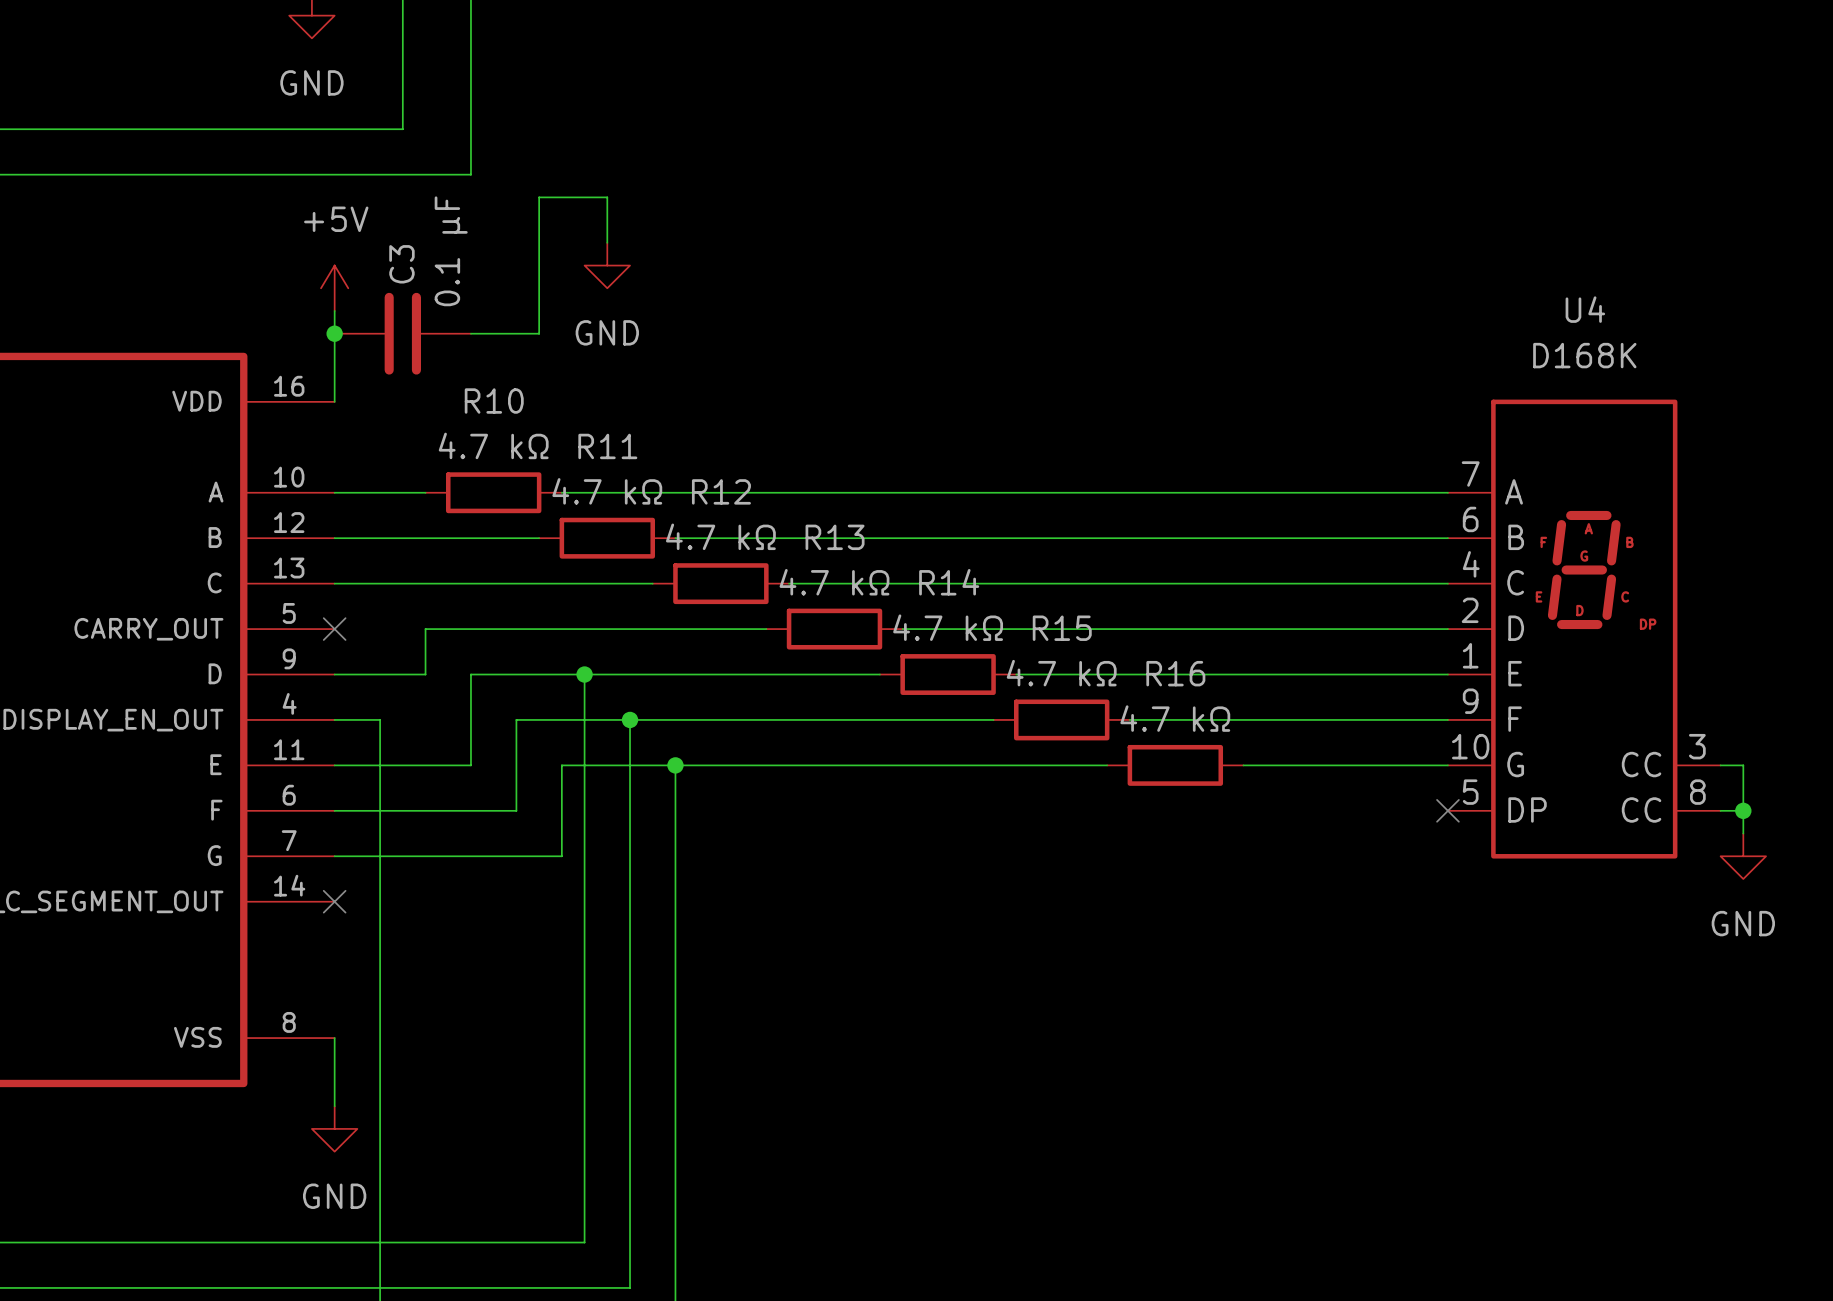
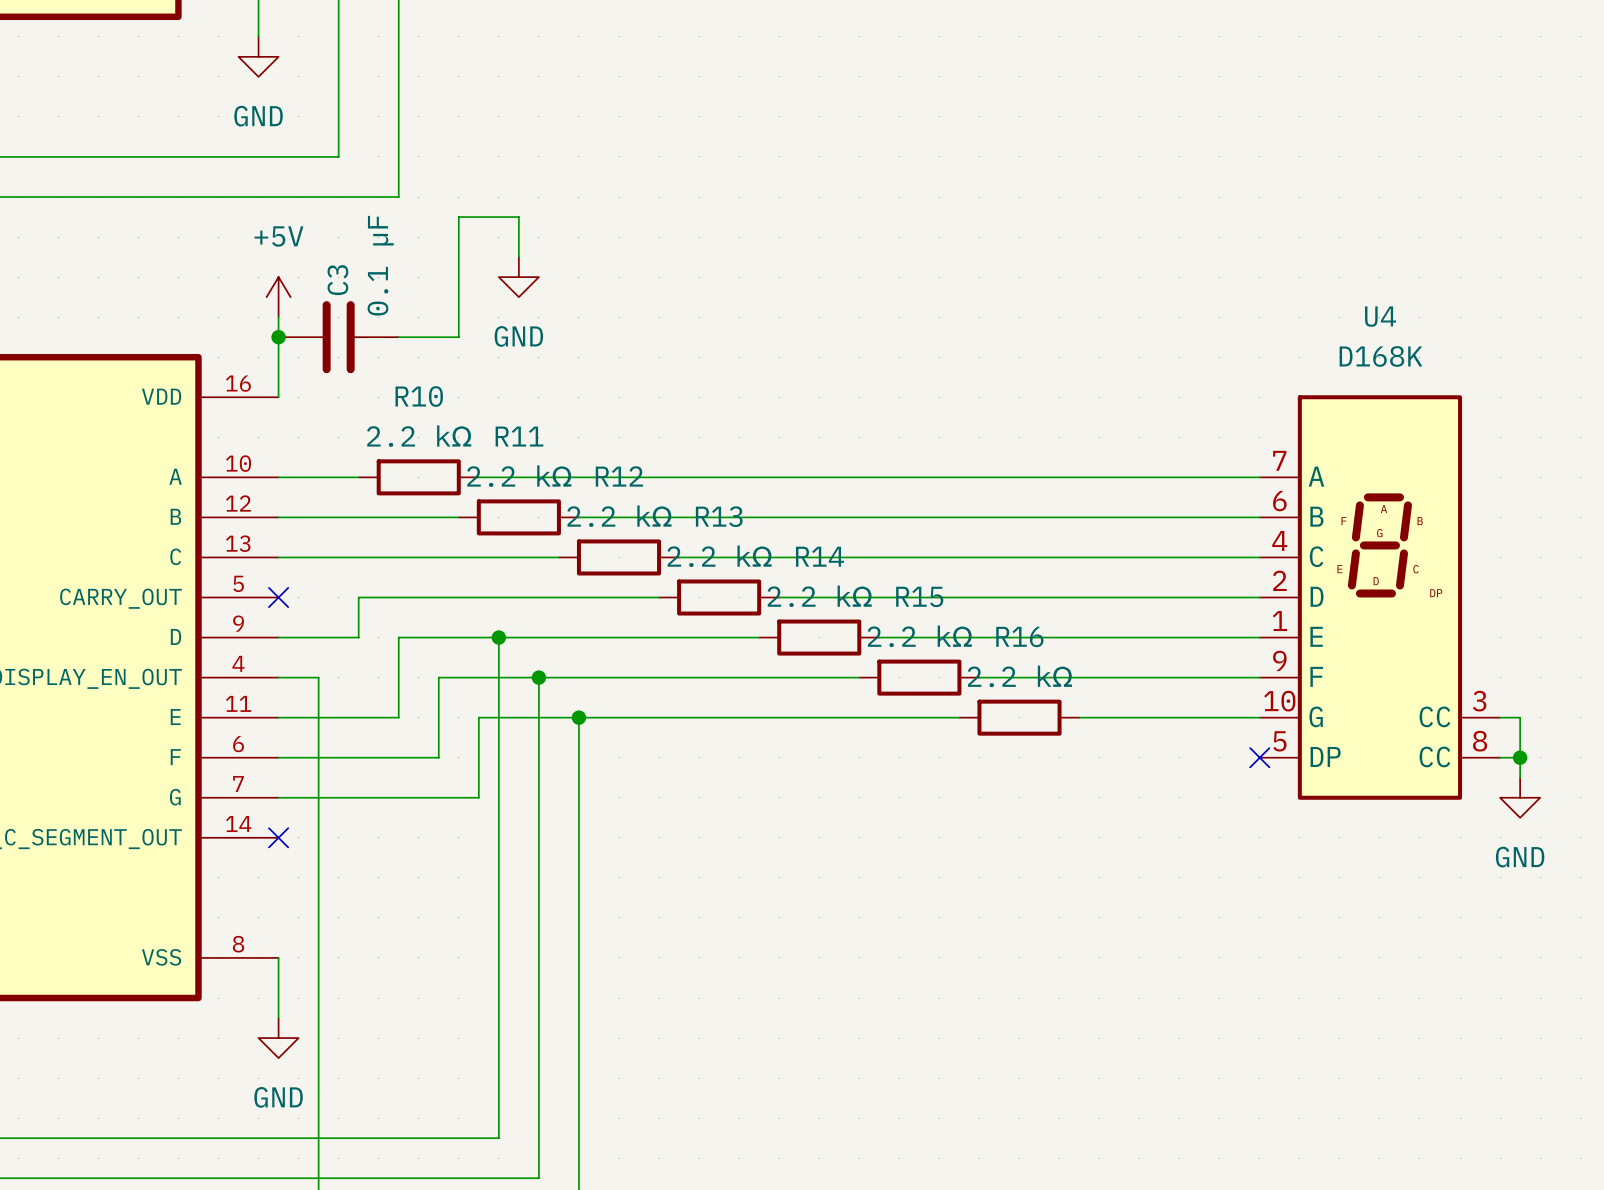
R10 value: 4.7 kΩ (493, 445) -> 2.2 kΩ (419, 436)
R11 value: 4.7 kΩ (607, 491) -> 2.2 kΩ (519, 476)
R12 value: 4.7 kΩ (720, 536) -> 2.2 kΩ (619, 516)
R13 value: 4.7 kΩ (834, 582) -> 2.2 kΩ (719, 556)
R14 value: 4.7 kΩ (948, 627) -> 2.2 kΩ (819, 596)
R15 value: 4.7 kΩ (1061, 673) -> 2.2 kΩ (919, 636)
R16 value: 4.7 kΩ (1175, 718) -> 2.2 kΩ (1019, 676)

